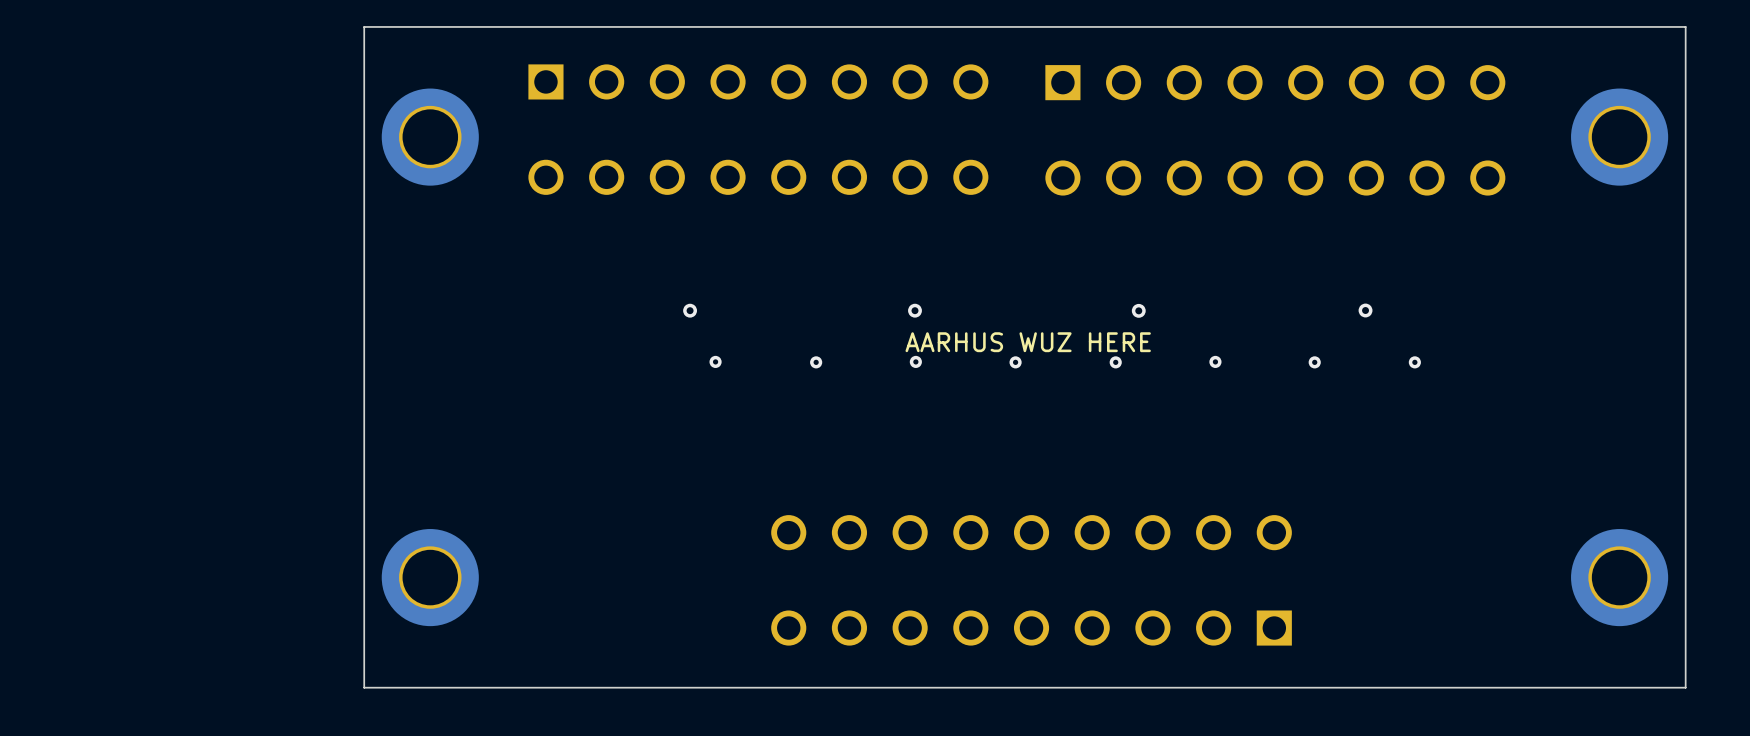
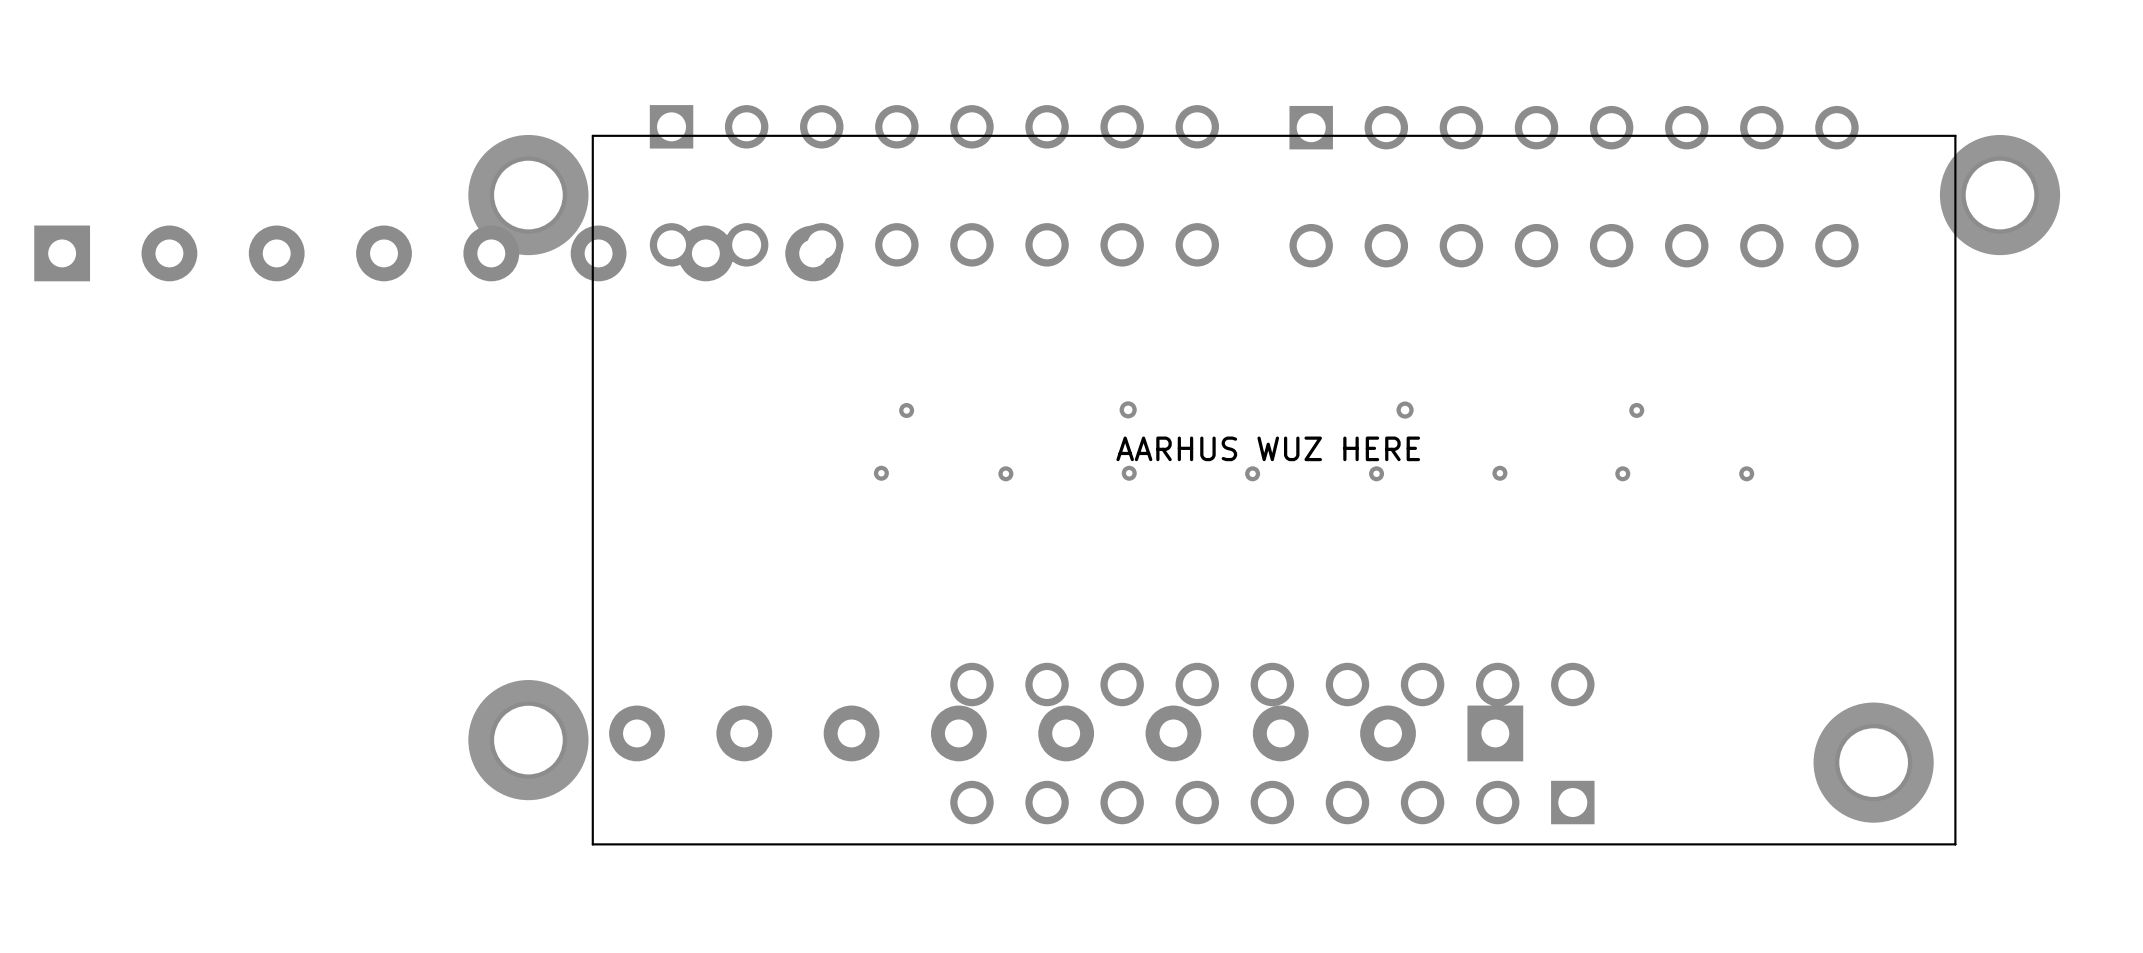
board edge: (1685, 26) (364, 26) (364, 687) (1685, 687) (1685, 26) -> (1955, 135) (1955, 844) (592, 844) (592, 135) (1955, 135)
part: none -> (437, 253)
via: (690, 310) -> none
via: (1365, 310) -> none
via: none -> (906, 410)
via: none -> (1636, 410)
part: none -> (1066, 733)
part position: (1619, 577) -> (1873, 762)

